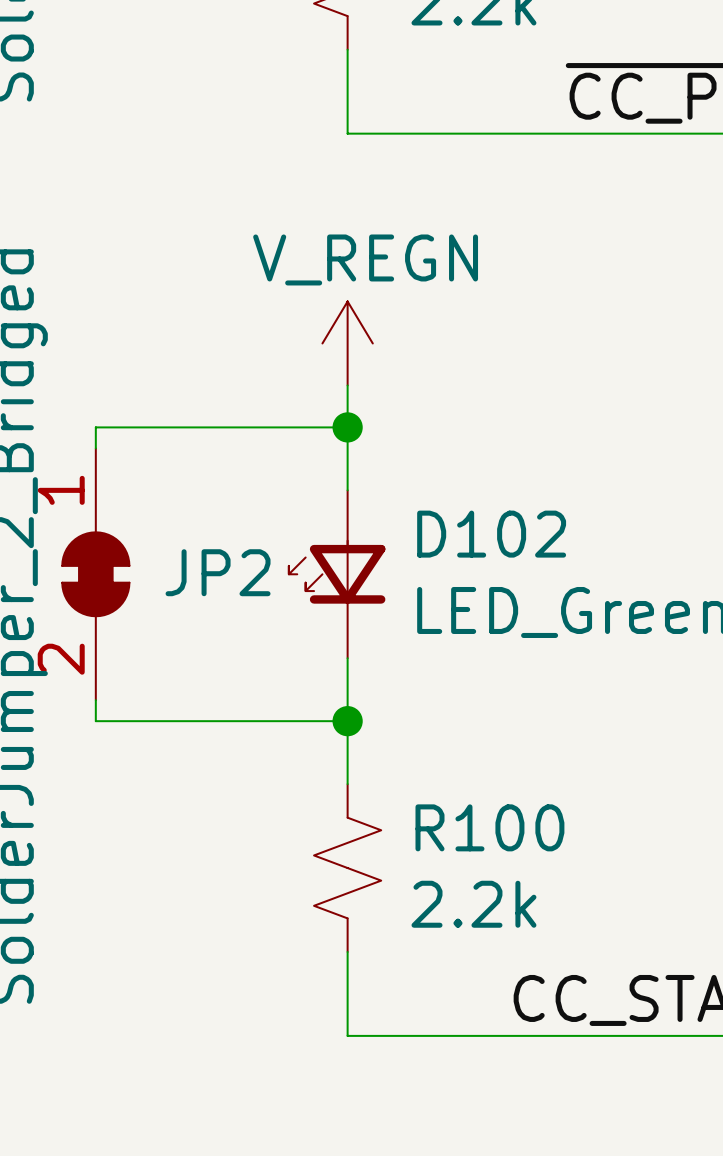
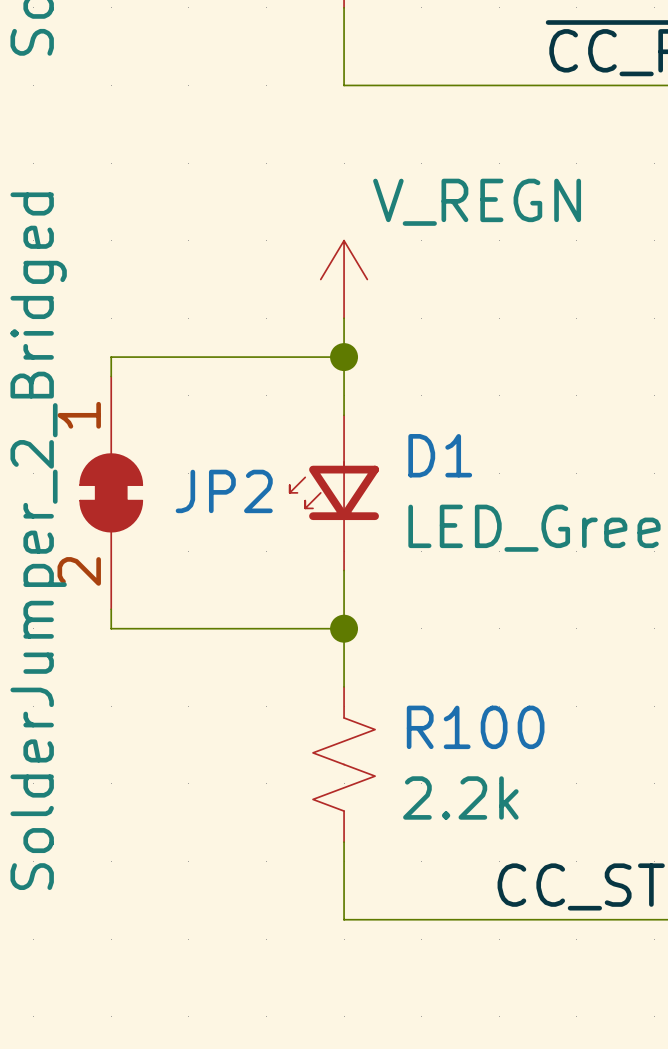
power symbol text position: V_REGN (365, 259) -> V_REGN (477, 202)
D102 name: D102 (491, 534) -> D1 (440, 455)

